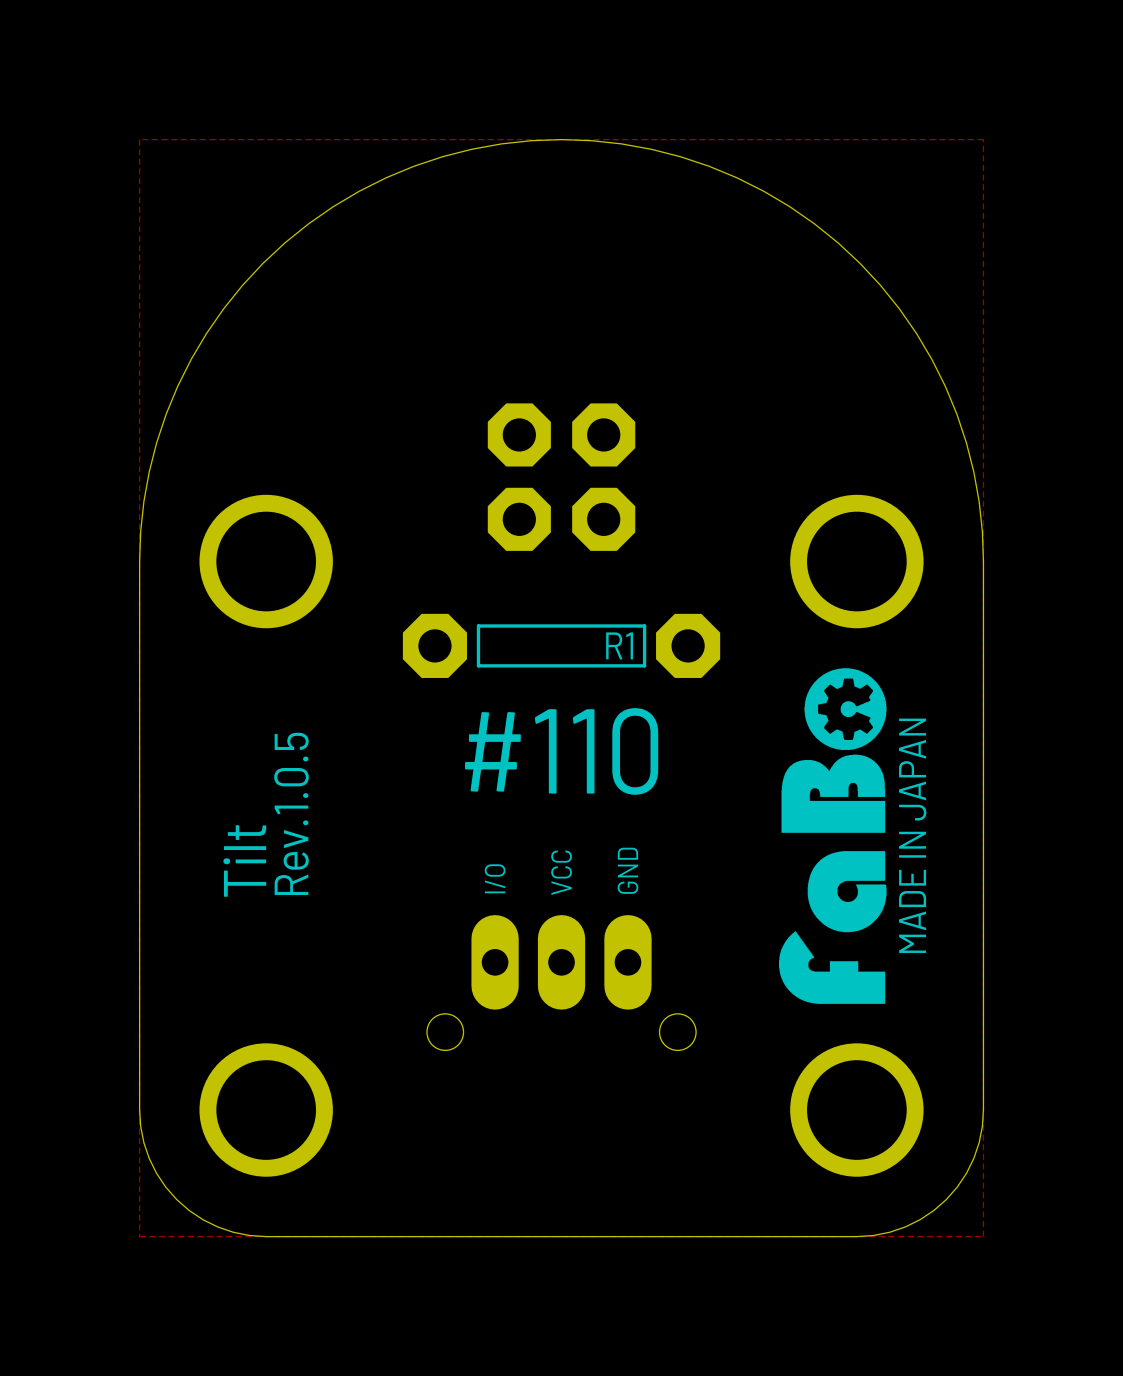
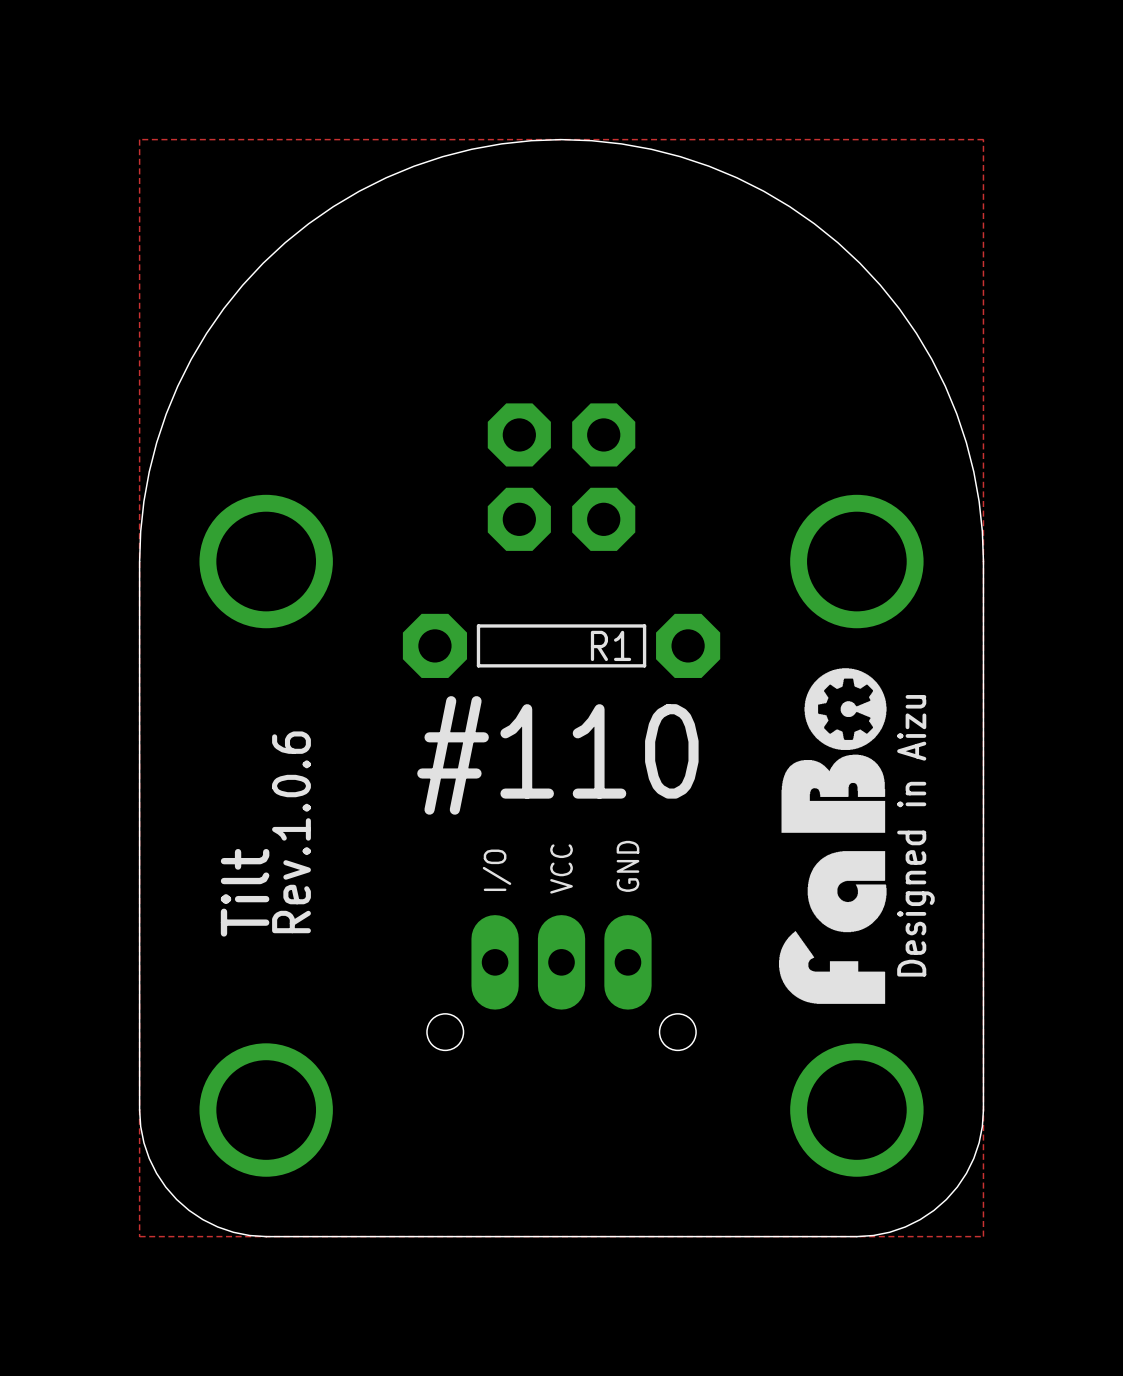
text: Rev.1.0.5 (291, 813) -> Rev.1.0.6 (291, 832)
text: MADE IN JAPAN (912, 835) -> Designed in Aizu (915, 835)
text position: Tilt (244, 860) -> Tilt (245, 892)

